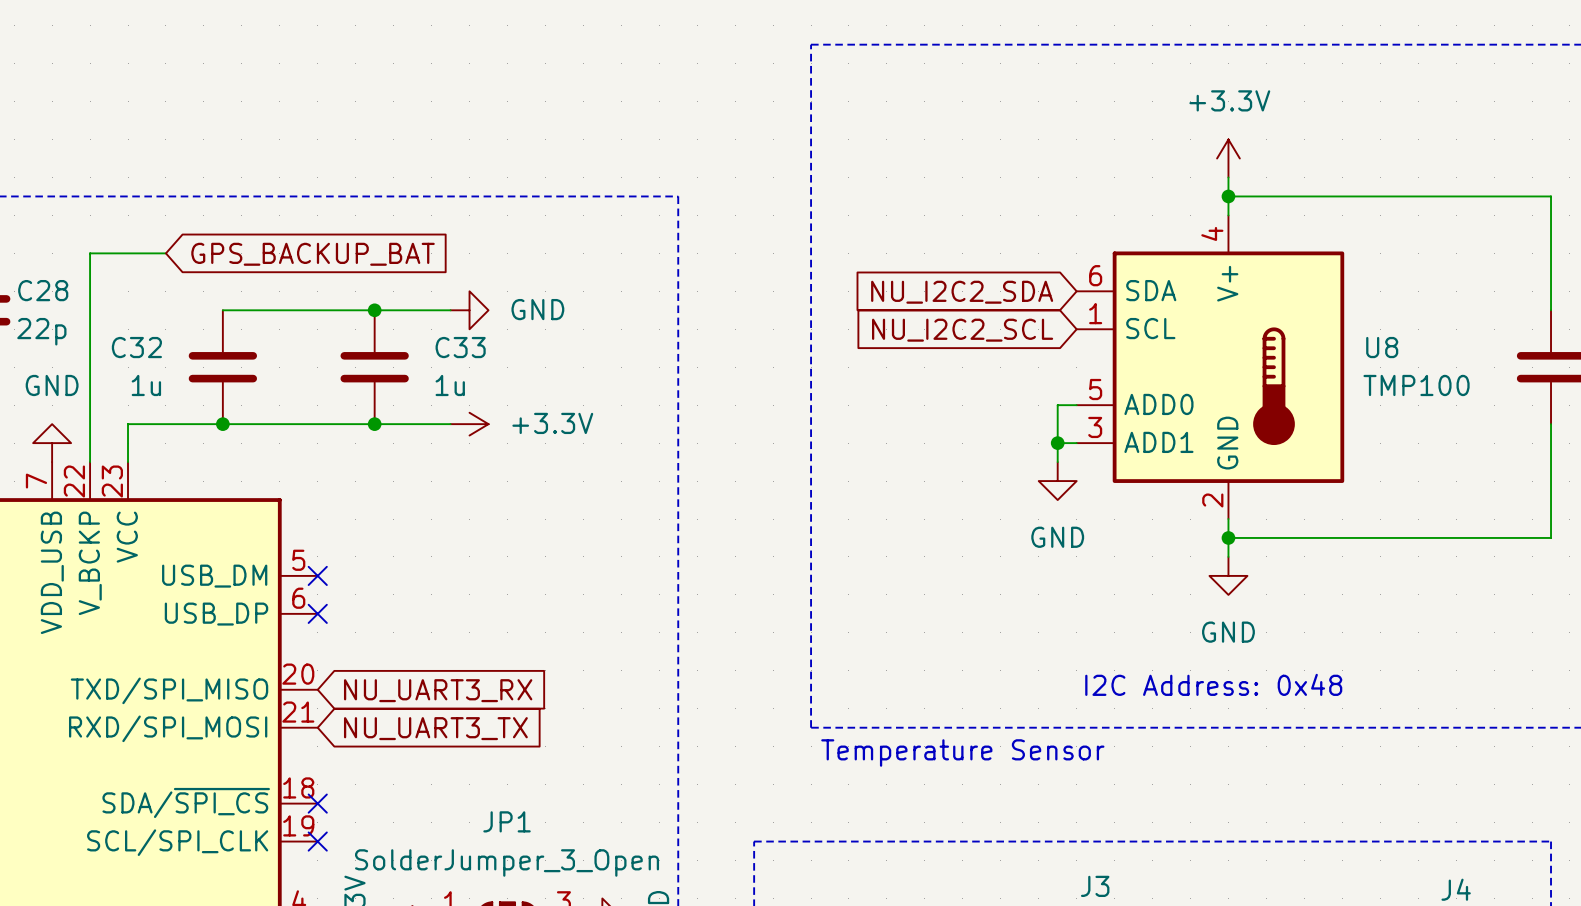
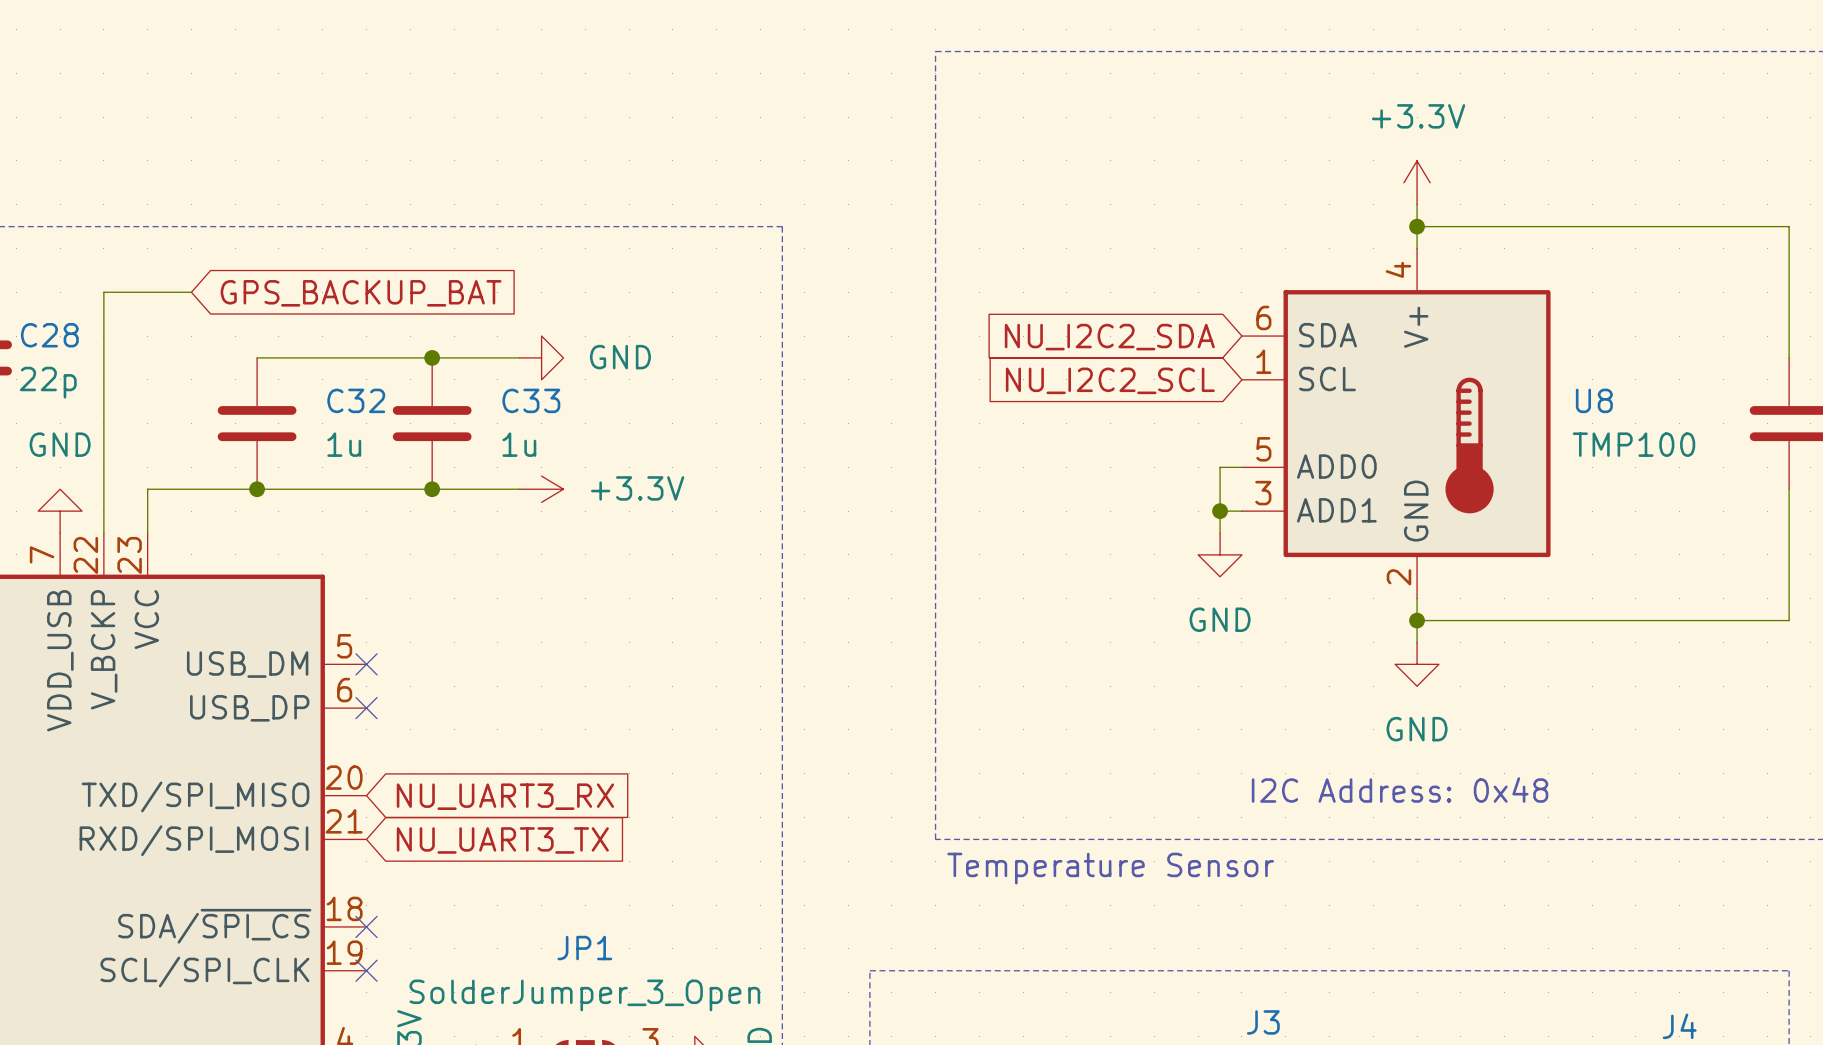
C32 name position: C32 (136, 347) -> C32 (356, 400)
C32 value position: 1u (146, 385) -> 1u (344, 444)

